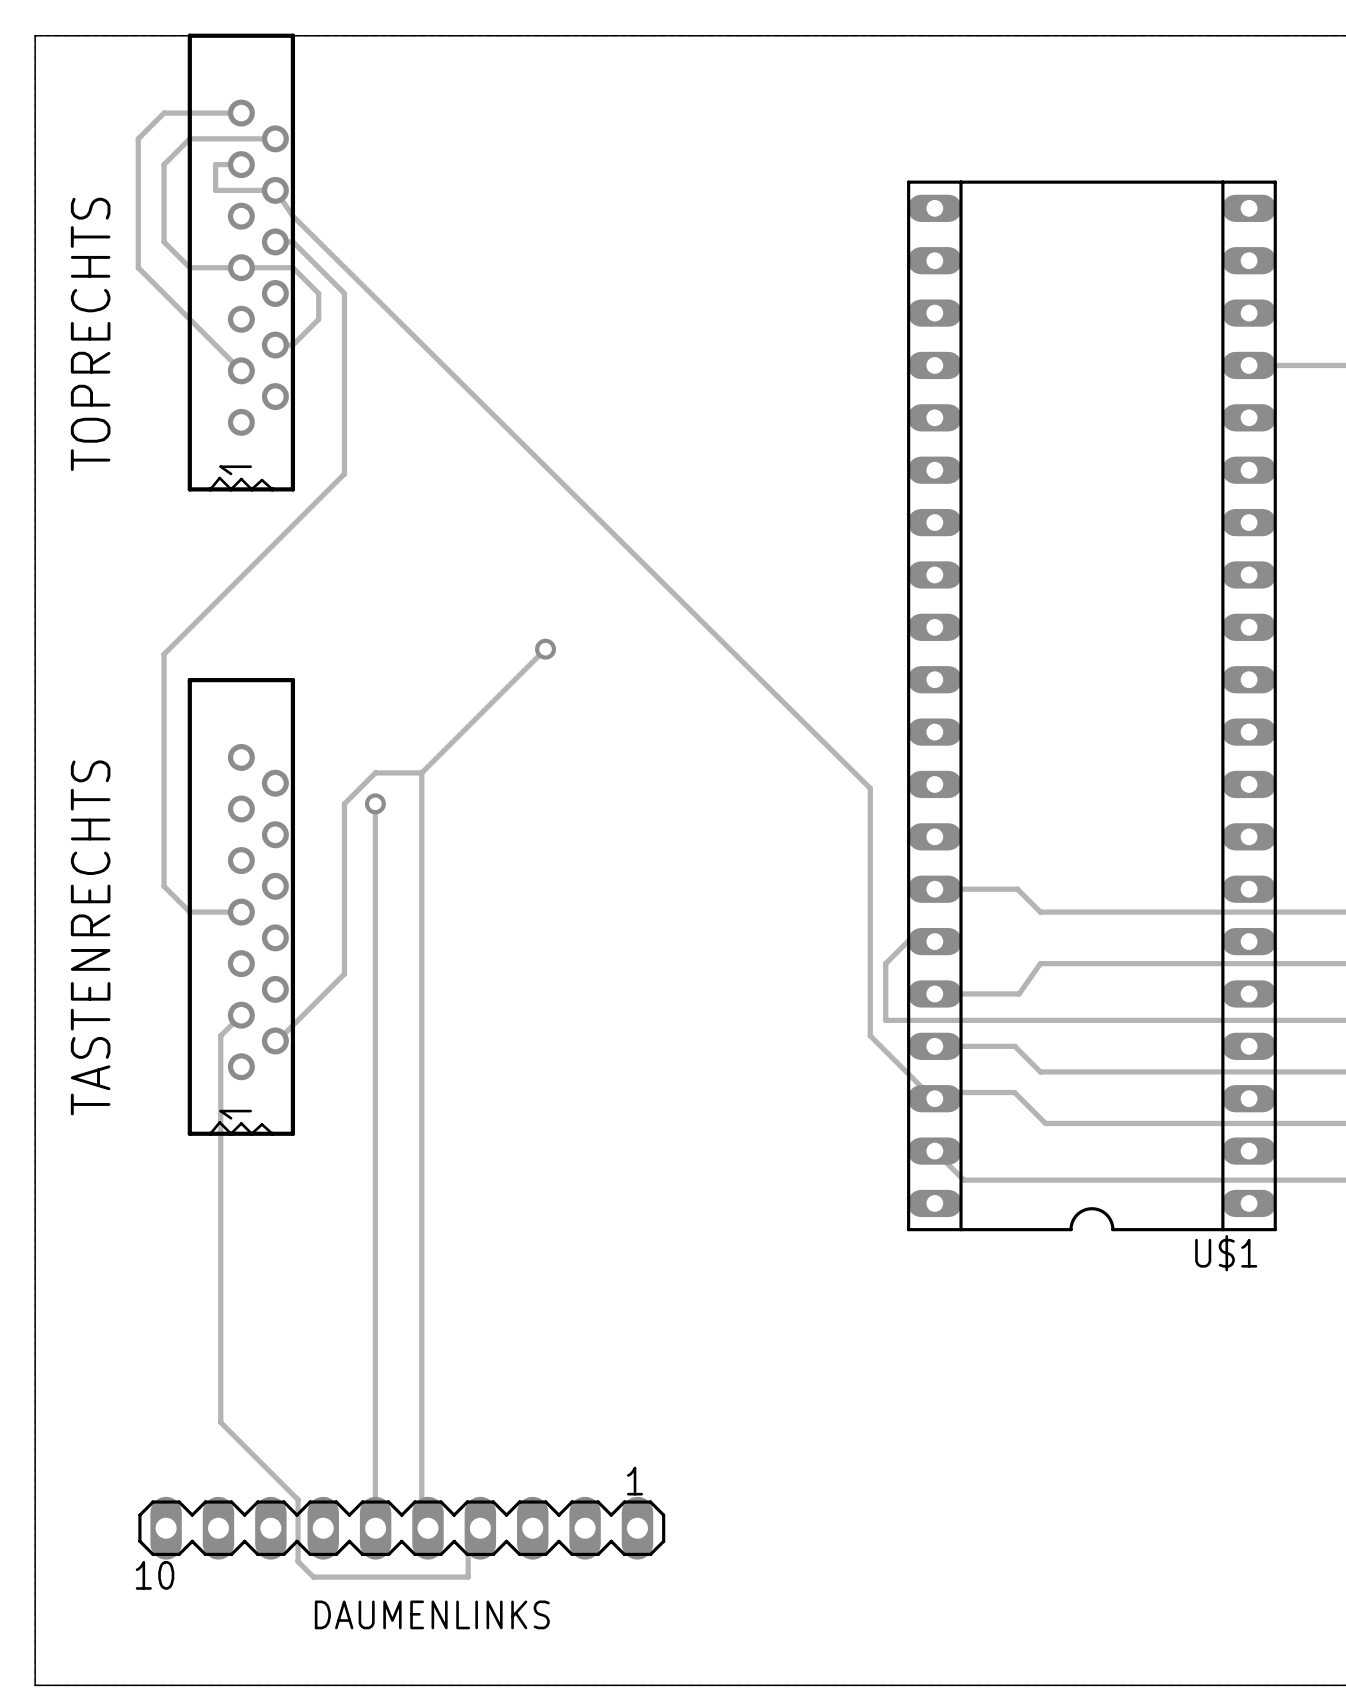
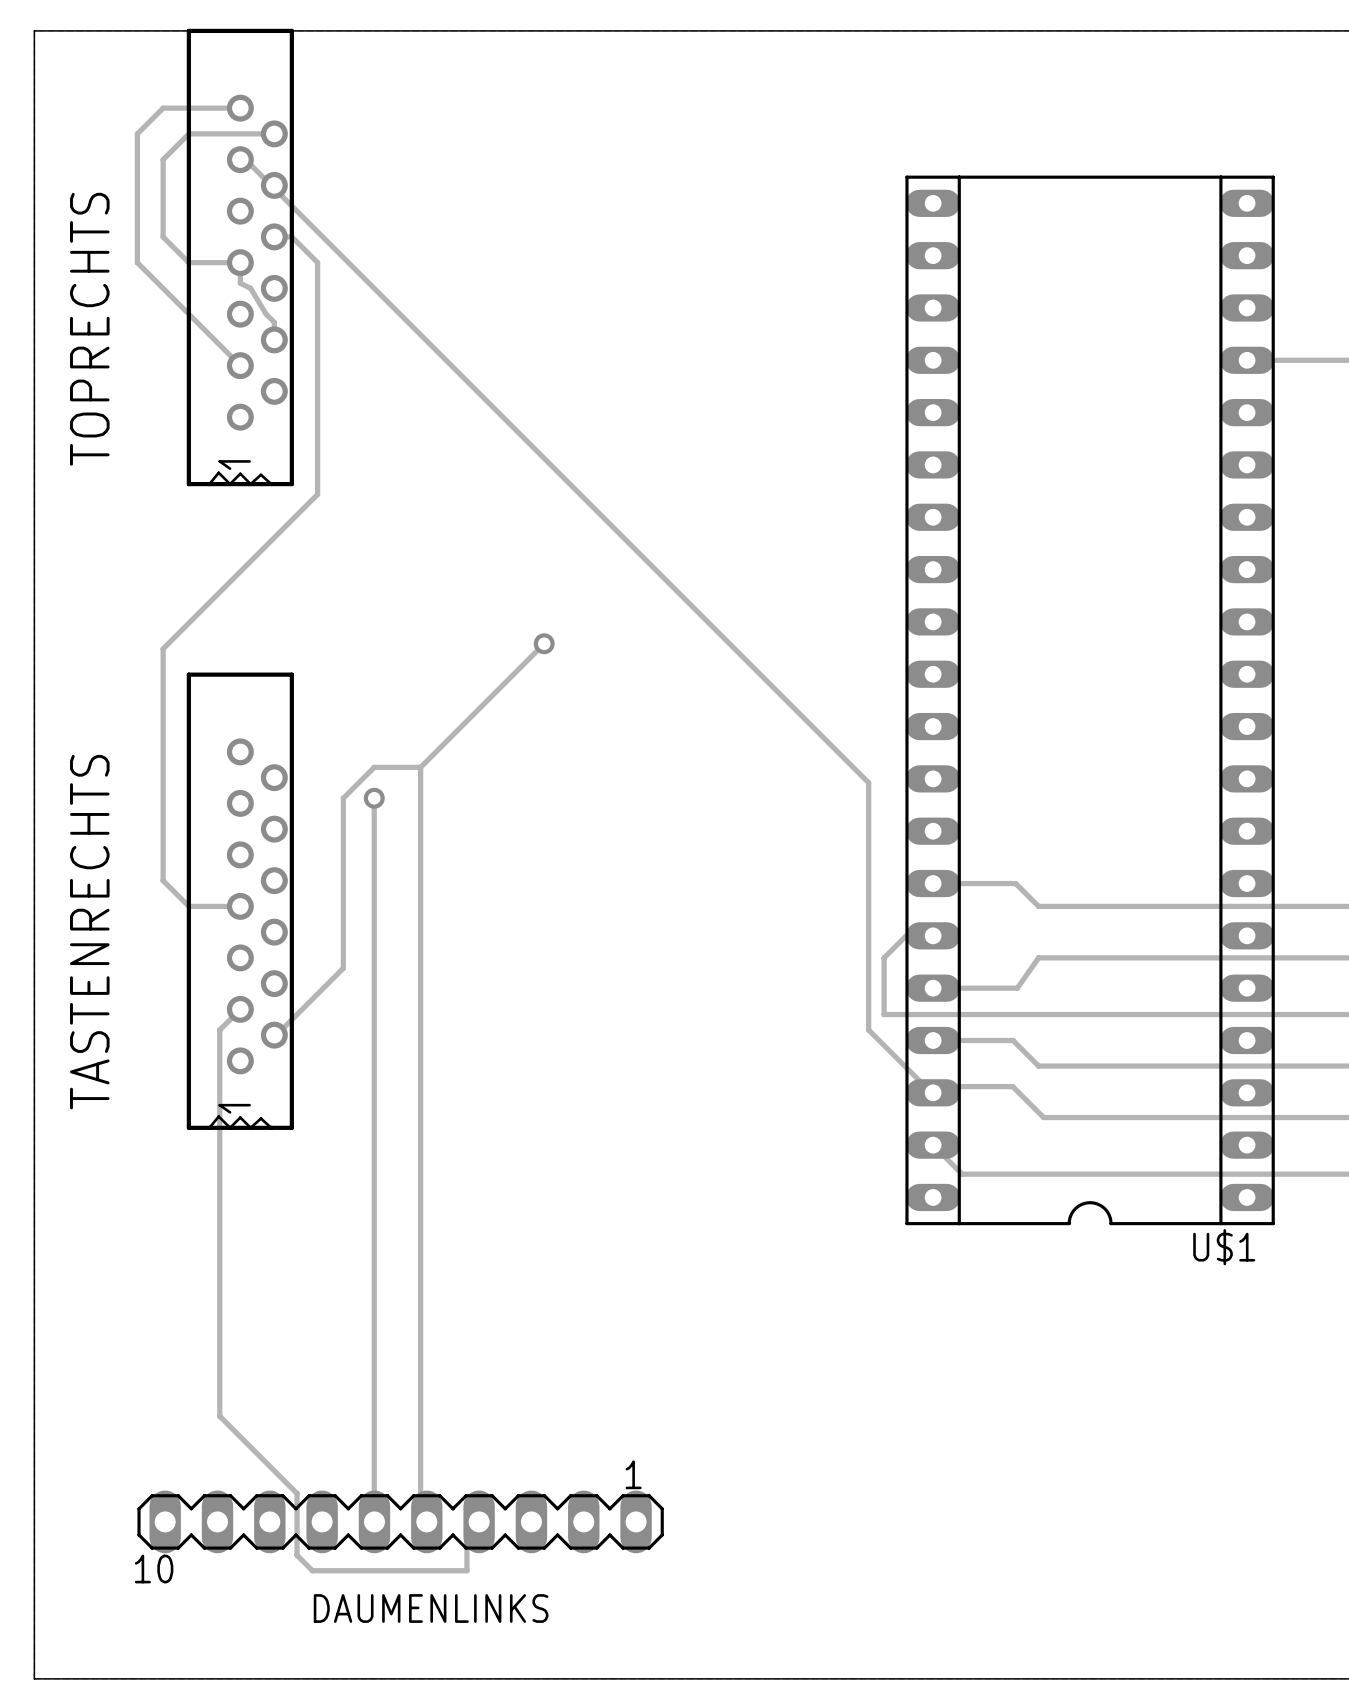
track: (241, 164) (215, 164) (215, 190) (275, 190) (292, 216) (870, 788) -> (240, 159) (250, 164) (266, 180) (274, 185) (281, 195) (868, 782)
track: (241, 267) (292, 267) (318, 293) -> (240, 262) (240, 283) (250, 288) (266, 314) (274, 322) (274, 339)
track: (318, 267) (344, 293) (344, 473) (318, 499) -> (317, 314) (317, 494)
track: none -> (317, 262) (317, 288)
track: (318, 319) (292, 345) (275, 345) -> none

